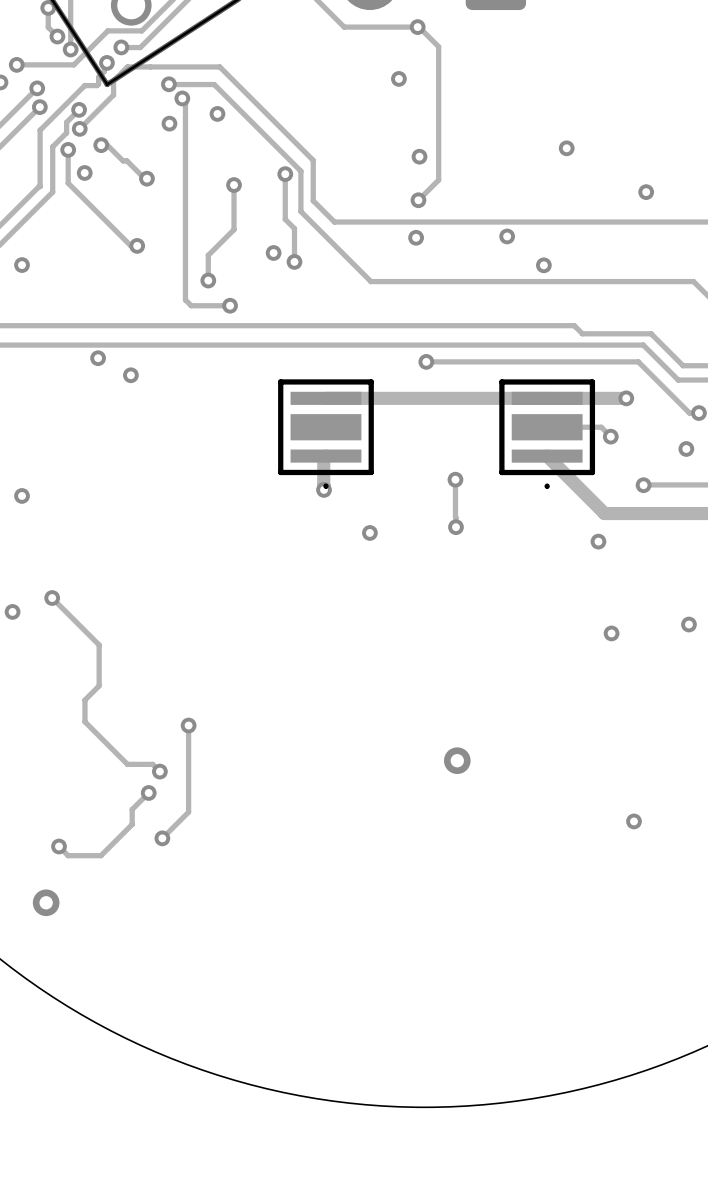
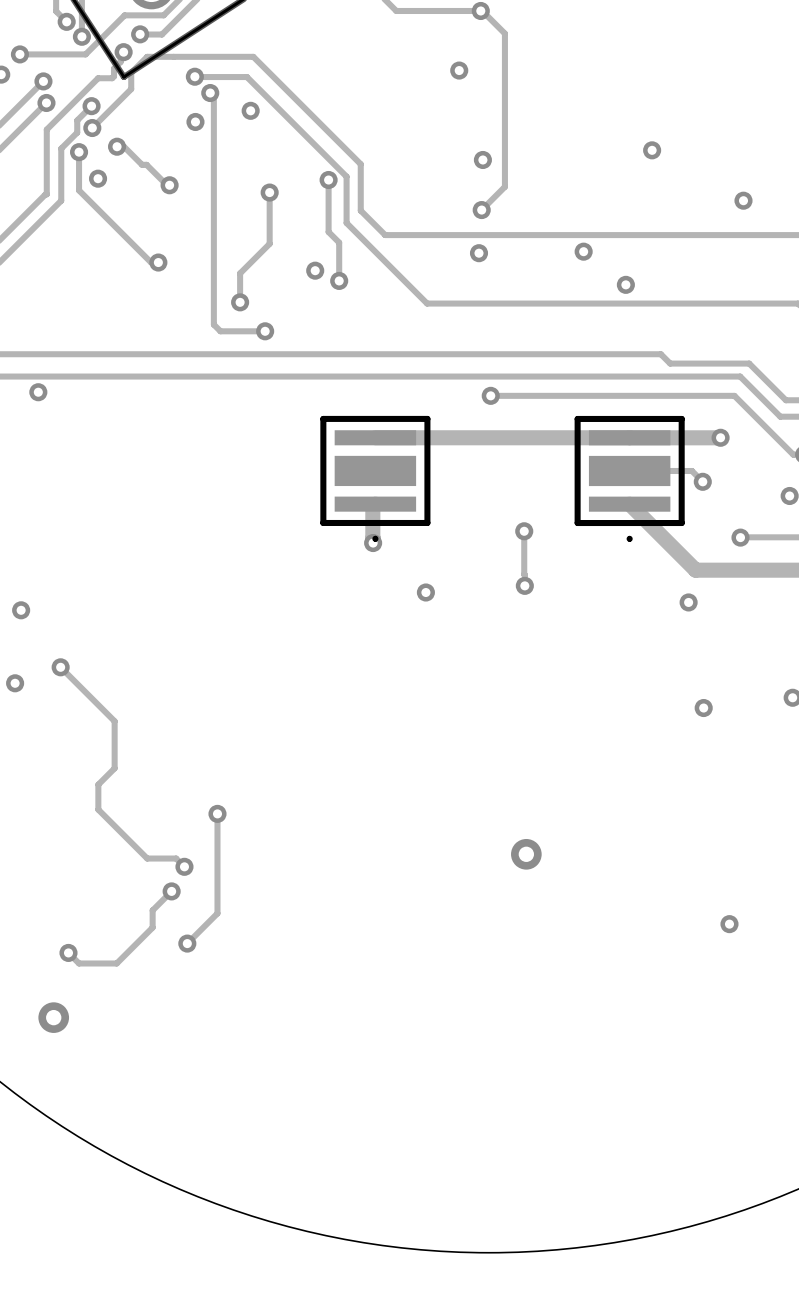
via: (22, 265) -> none
via: none -> (38, 392)
via: (98, 358) -> none
via: (130, 375) -> none
via position: (22, 495) -> (21, 610)

